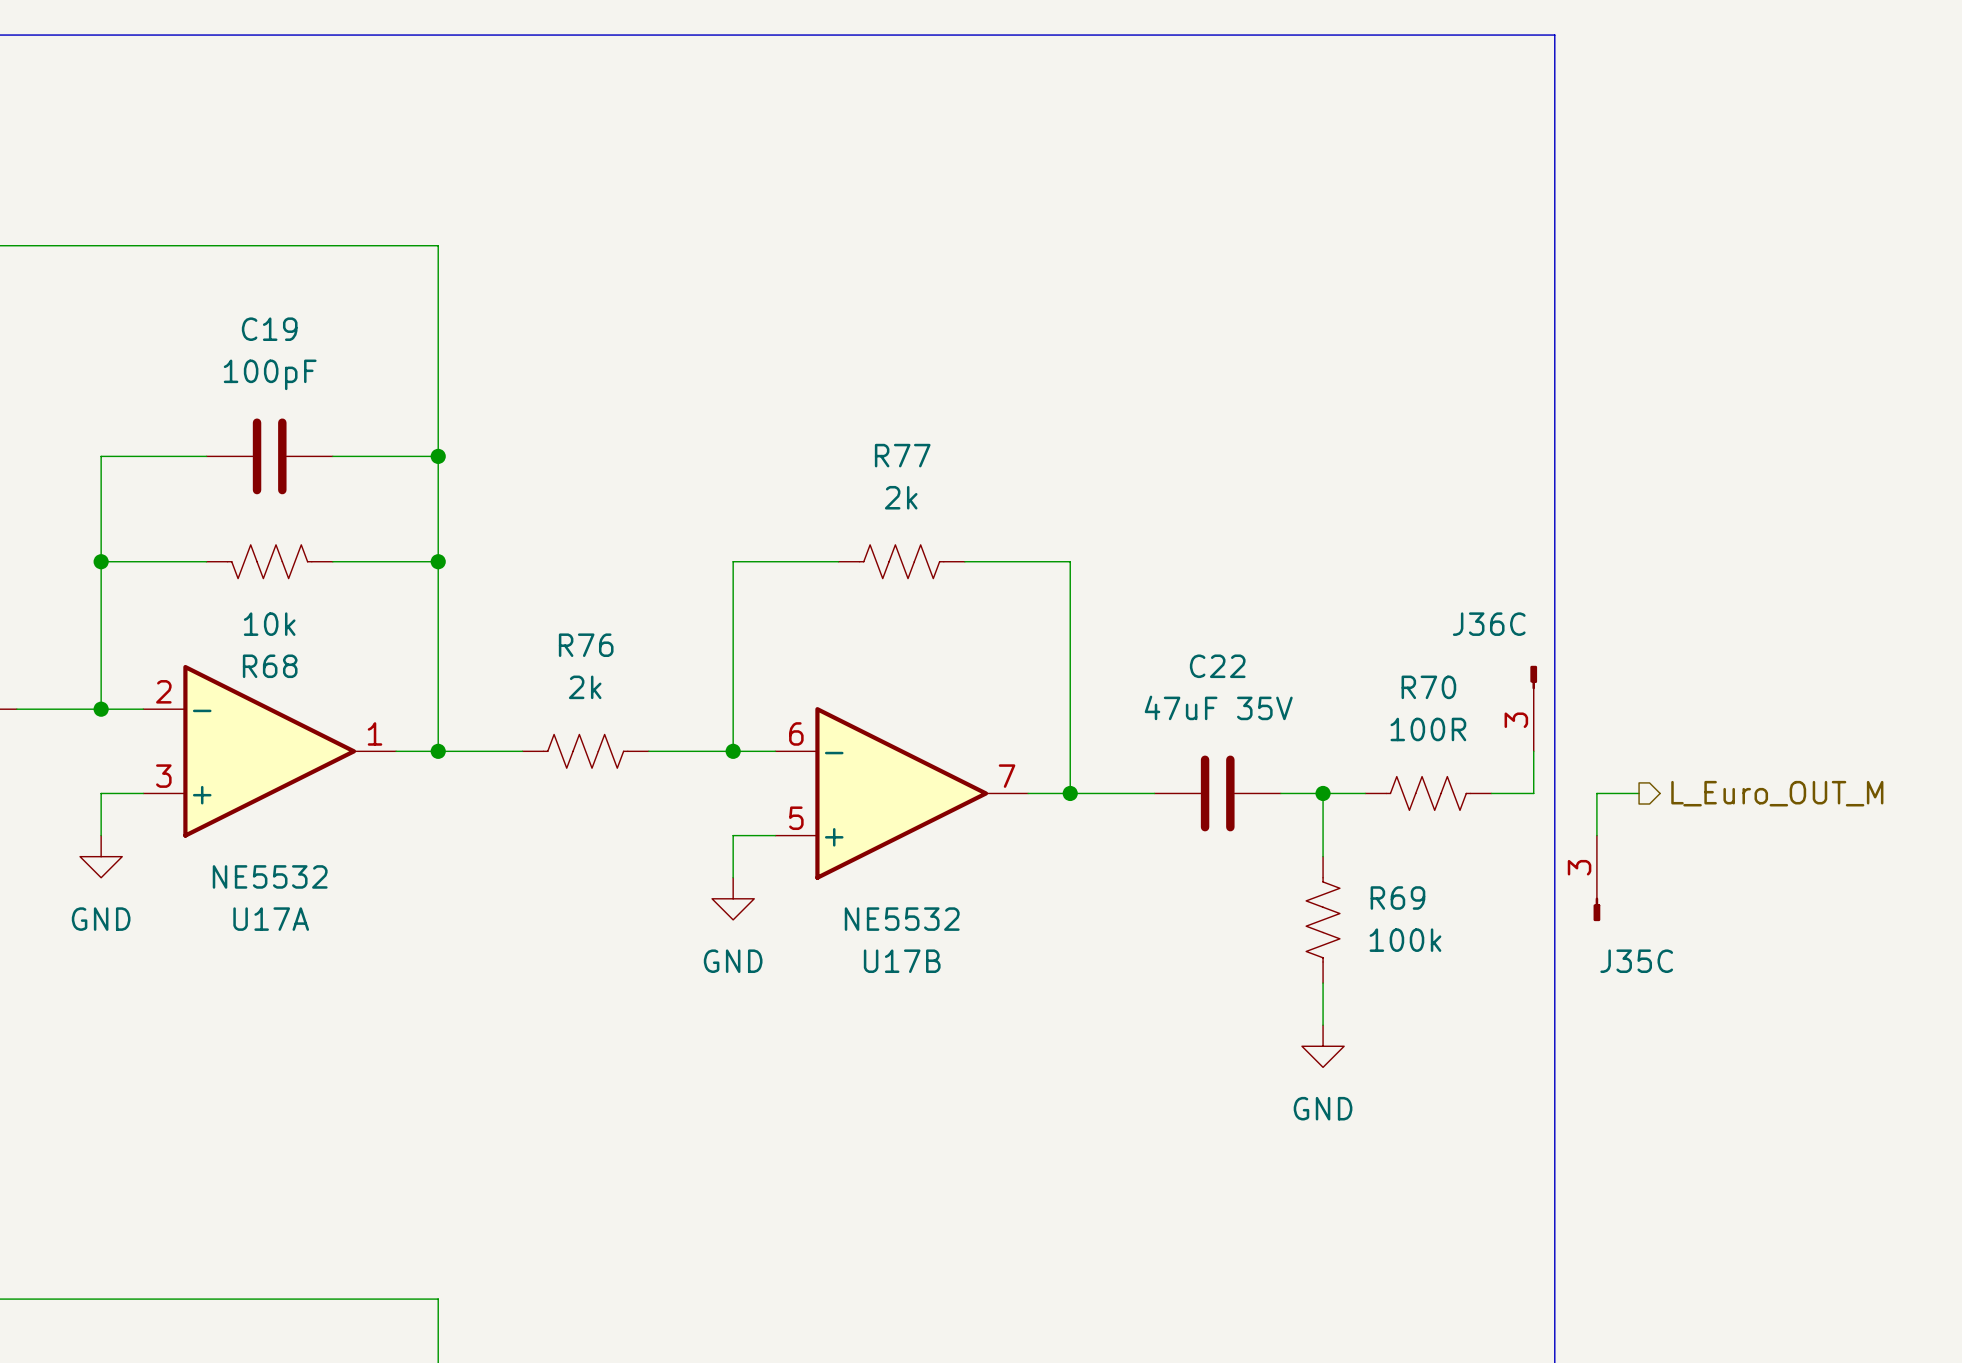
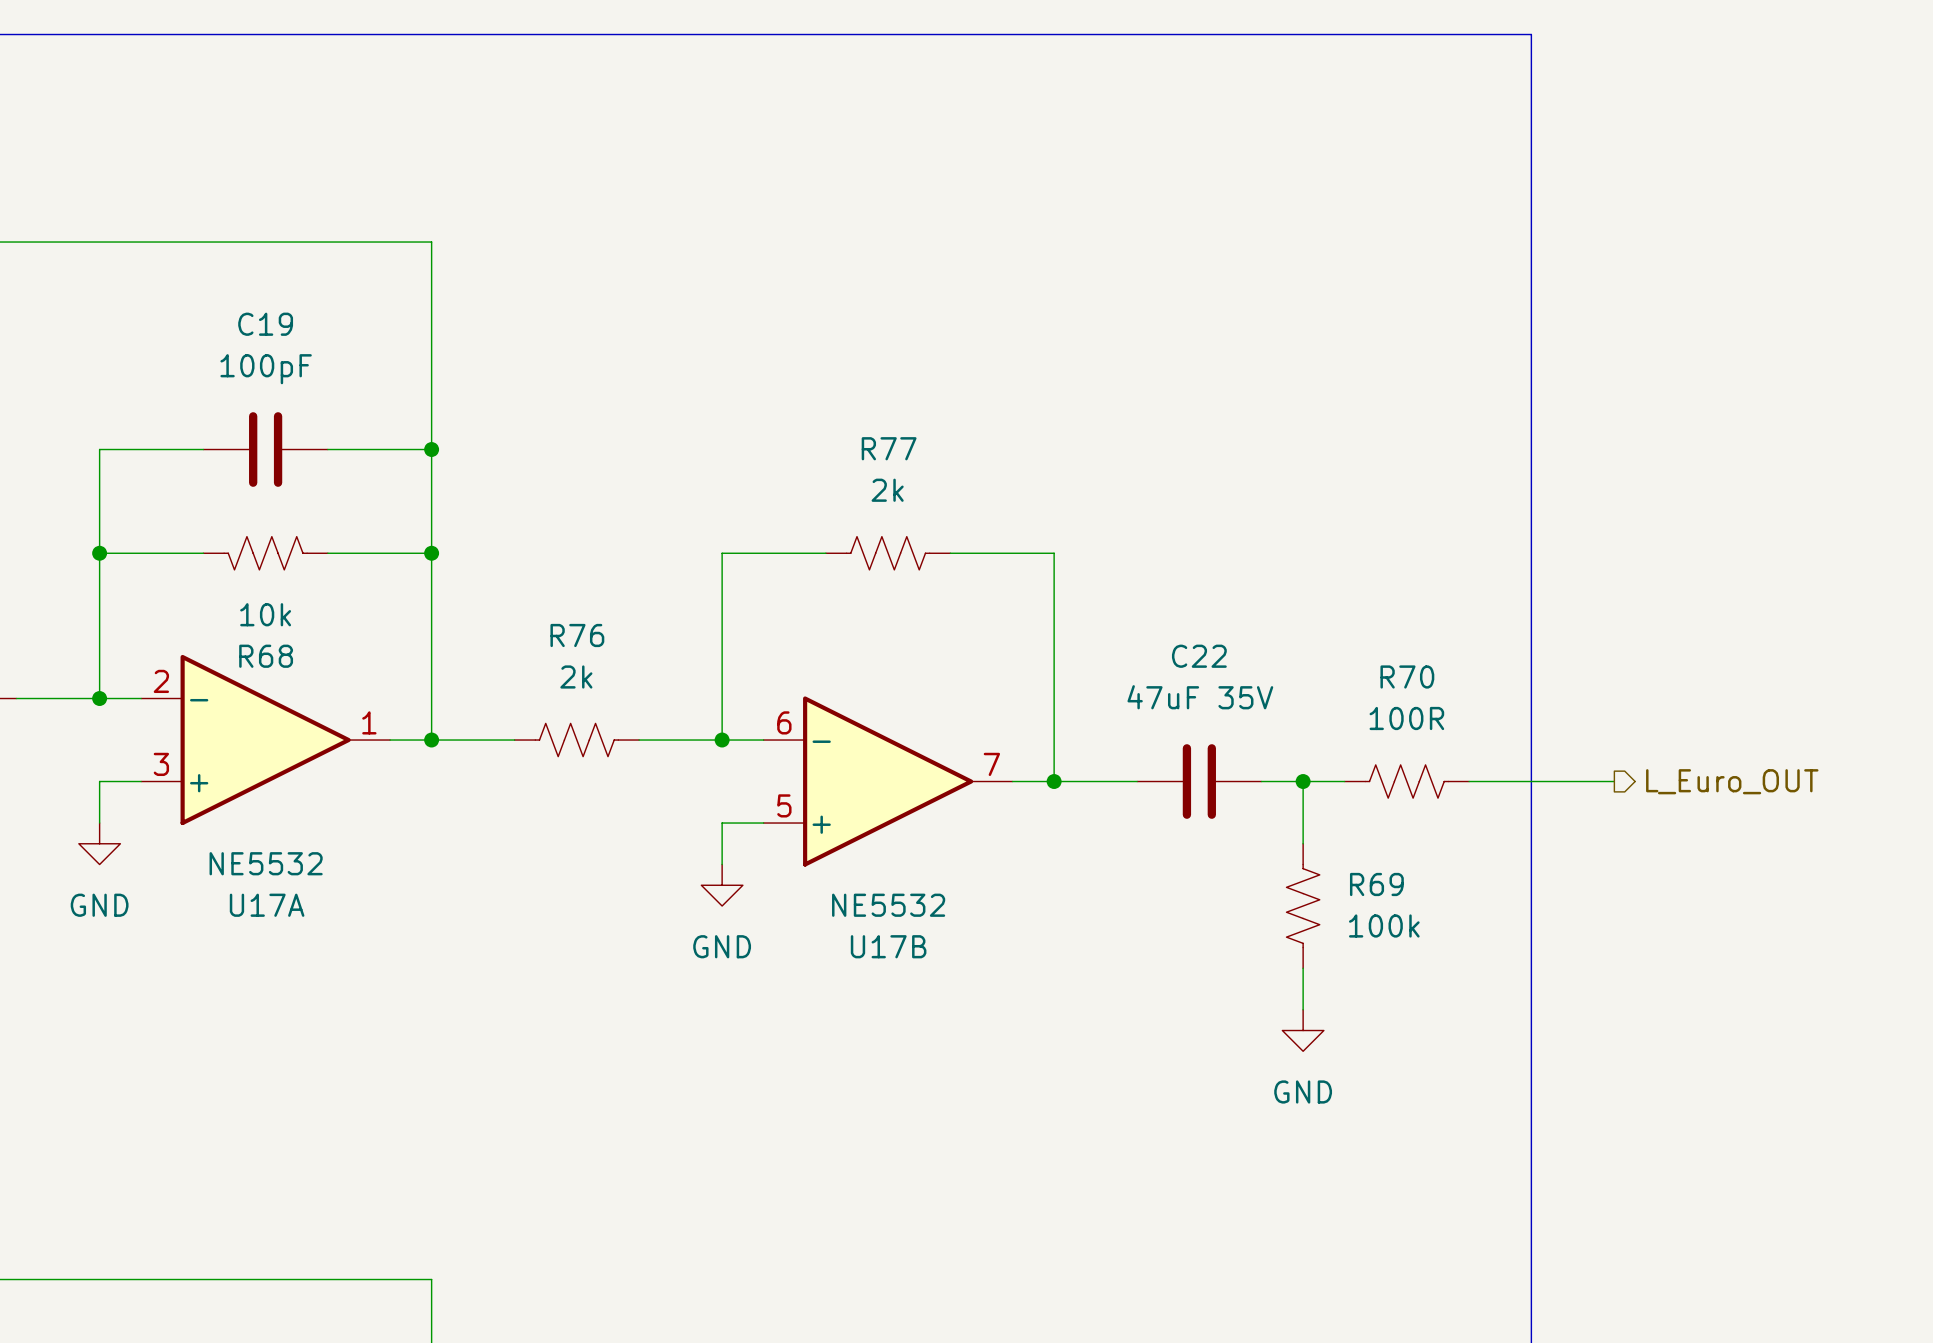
J36C: (1533, 708) -> none
wire: (1533, 751) (1533, 793) -> (1572, 781) (1510, 781)
wire: (1596, 793) (1596, 835) -> none
hierarchical label: L_Euro_OUT_M (1777, 793) -> L_Euro_OUT (1732, 781)
J35C: (1596, 878) -> none

